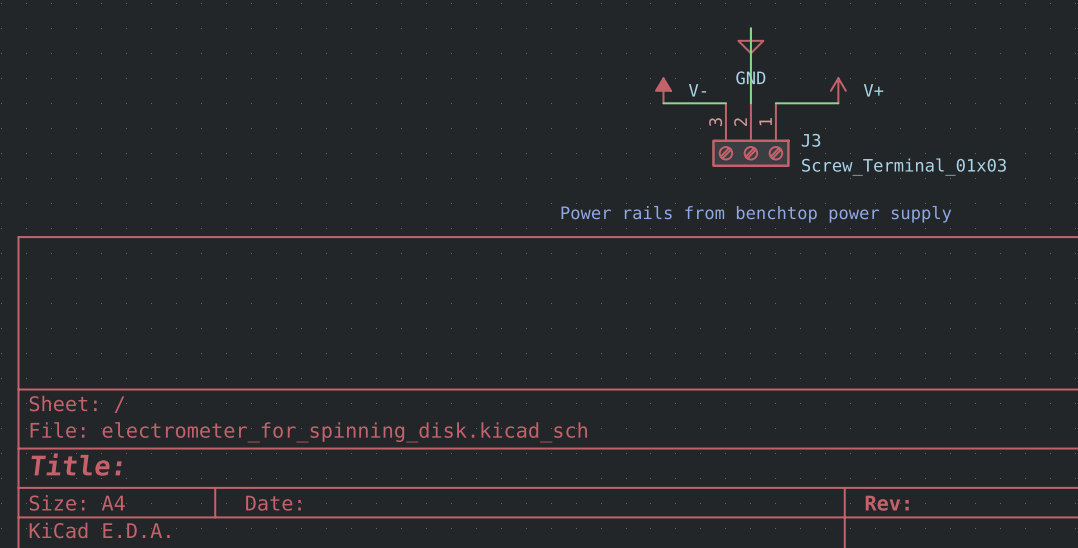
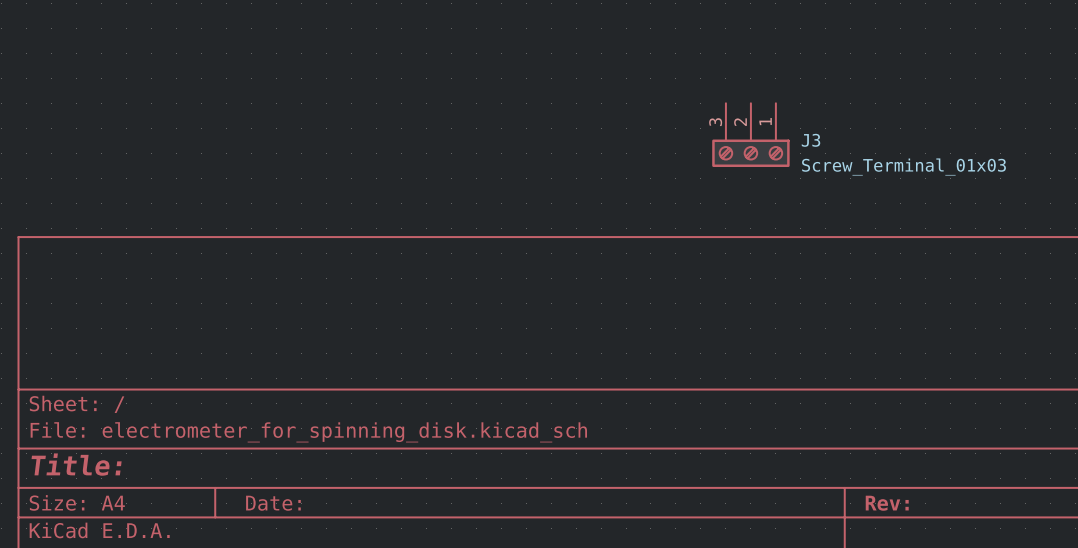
wire: (750, 28) (750, 103) -> none
power symbol: GND (750, 40) -> none
power symbol: V- (663, 90) -> none
power symbol: V+ (838, 90) -> none
wire: (663, 103) (725, 103) -> none
wire: (775, 103) (838, 103) -> none
text: Power rails from benchtop power supply (756, 214) -> none

